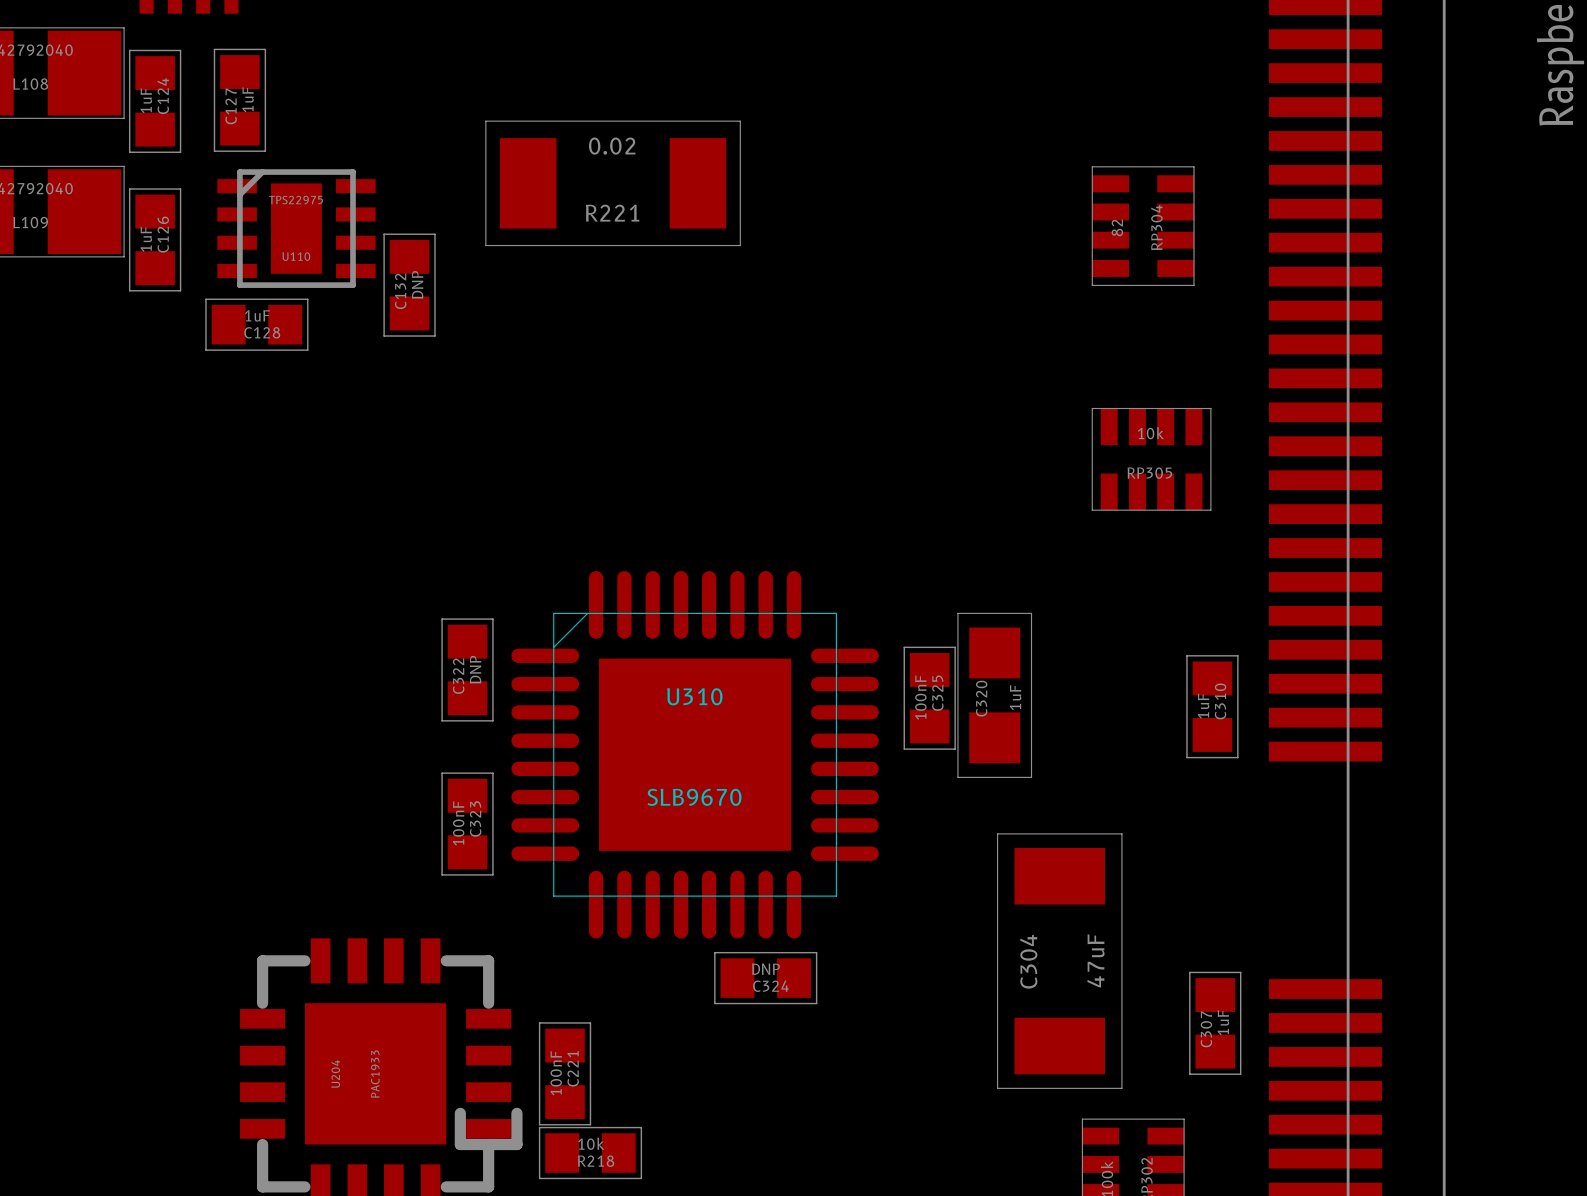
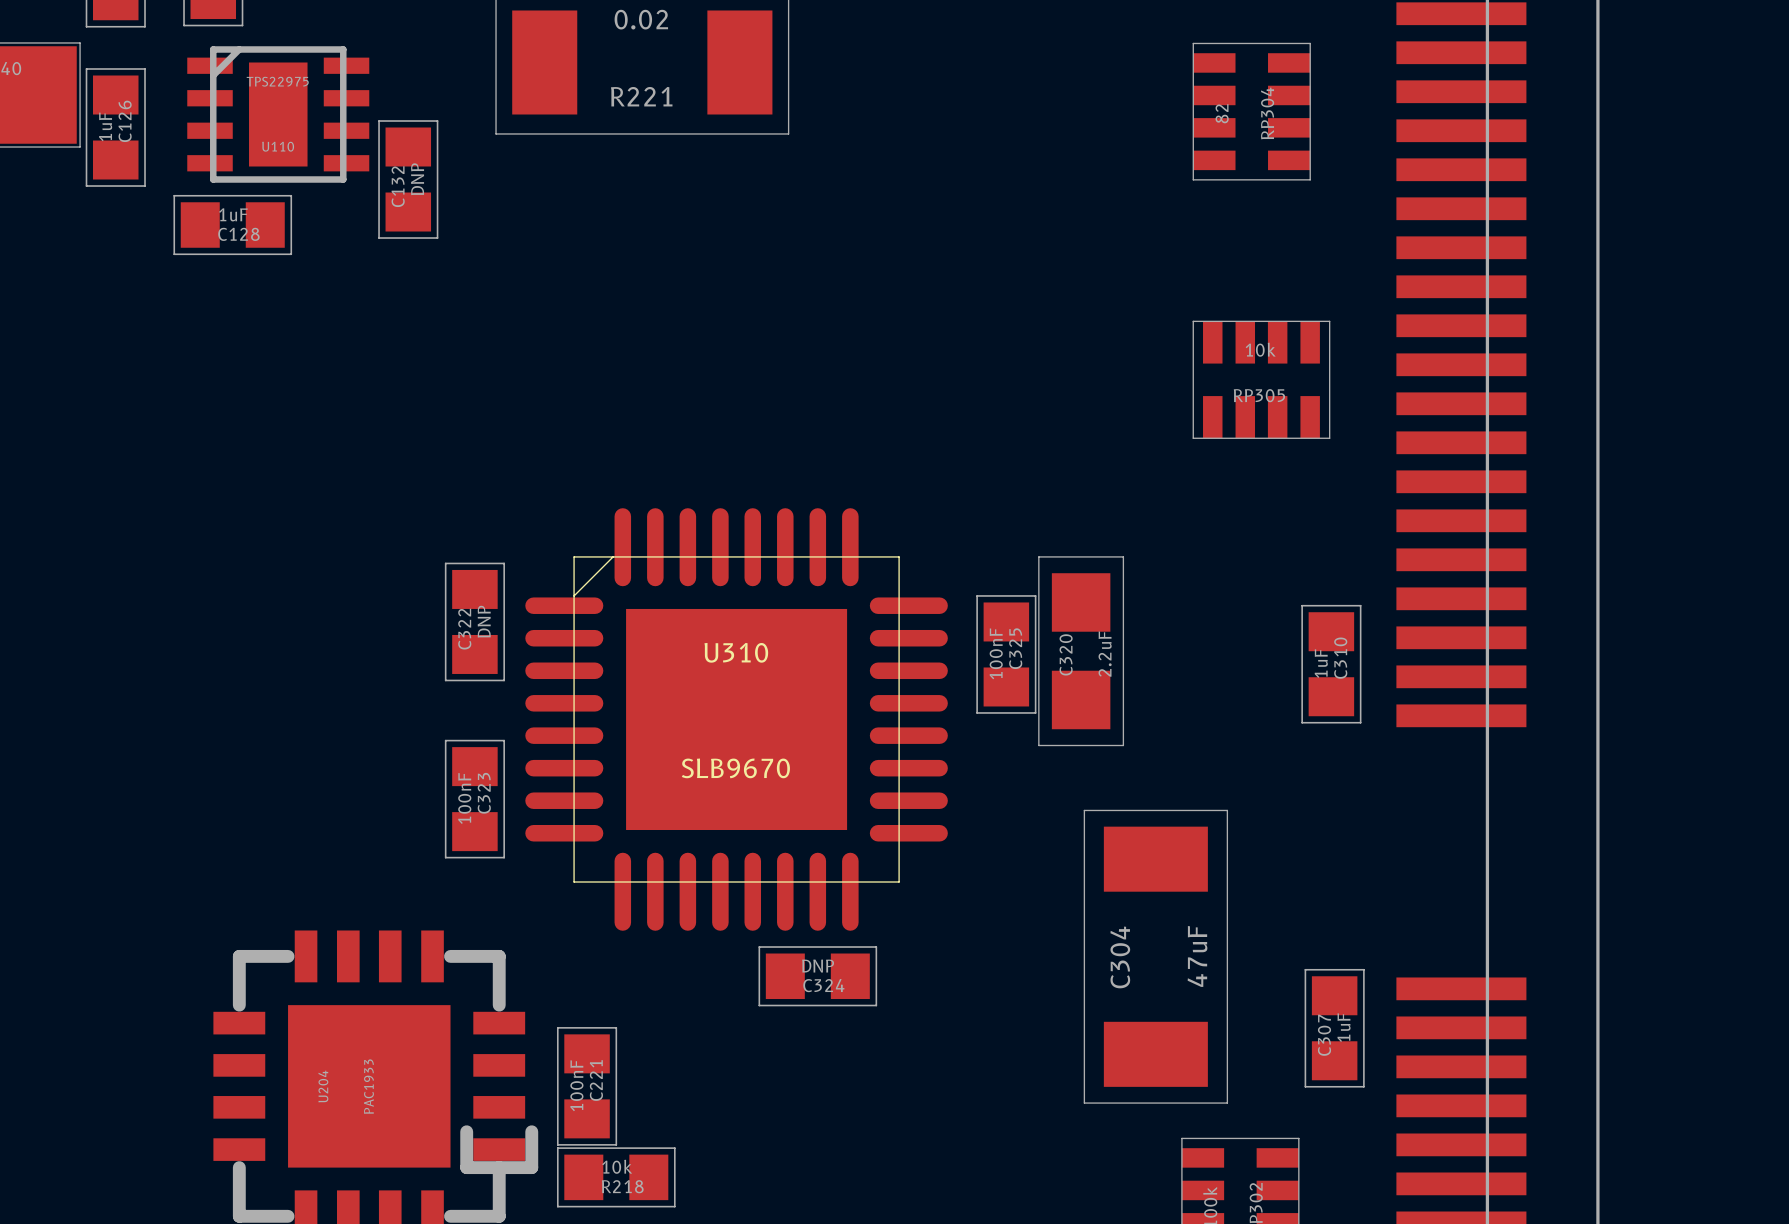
C320 value: 1uF (1015, 697) -> 2.2uF (1105, 654)

